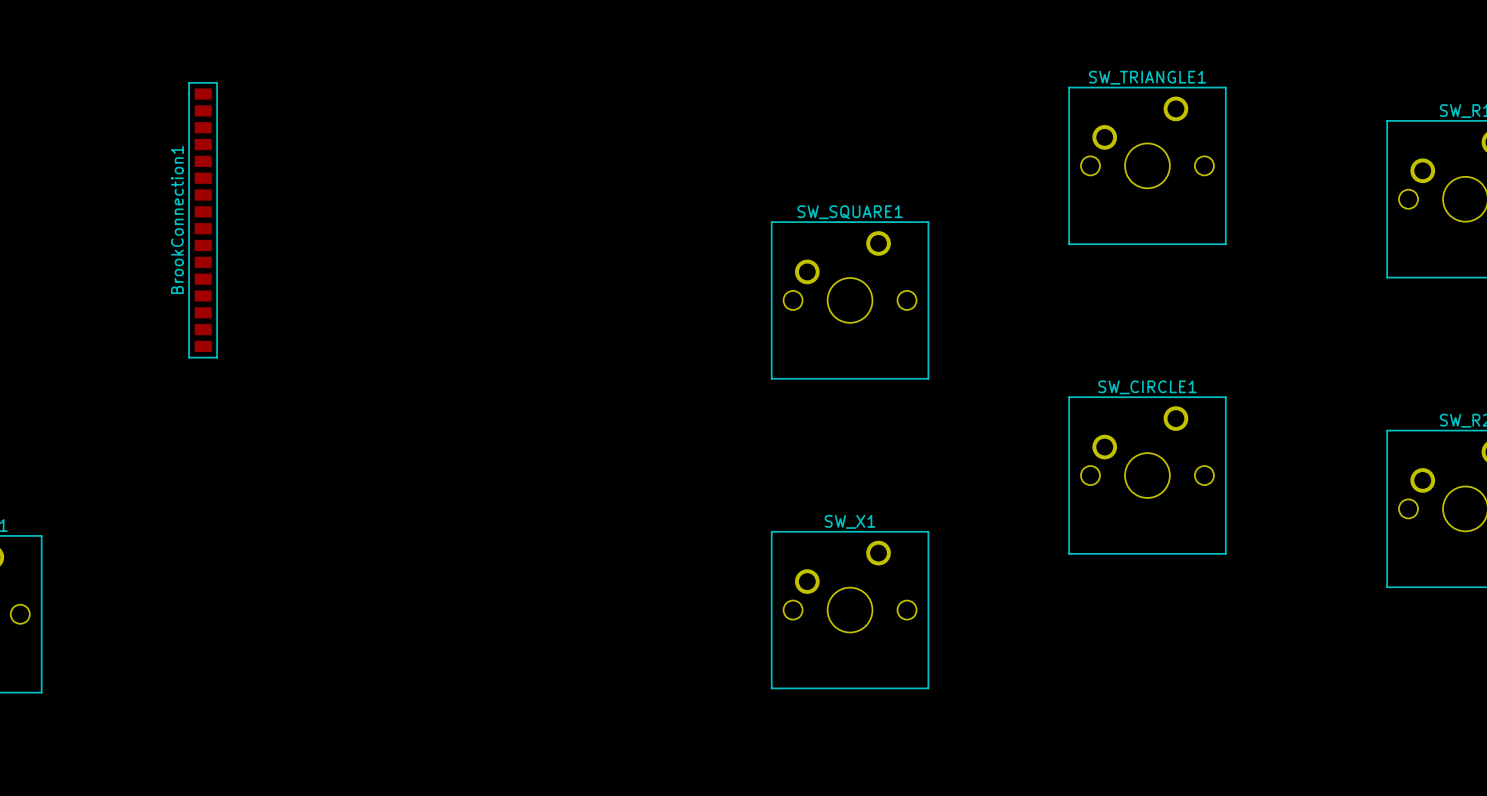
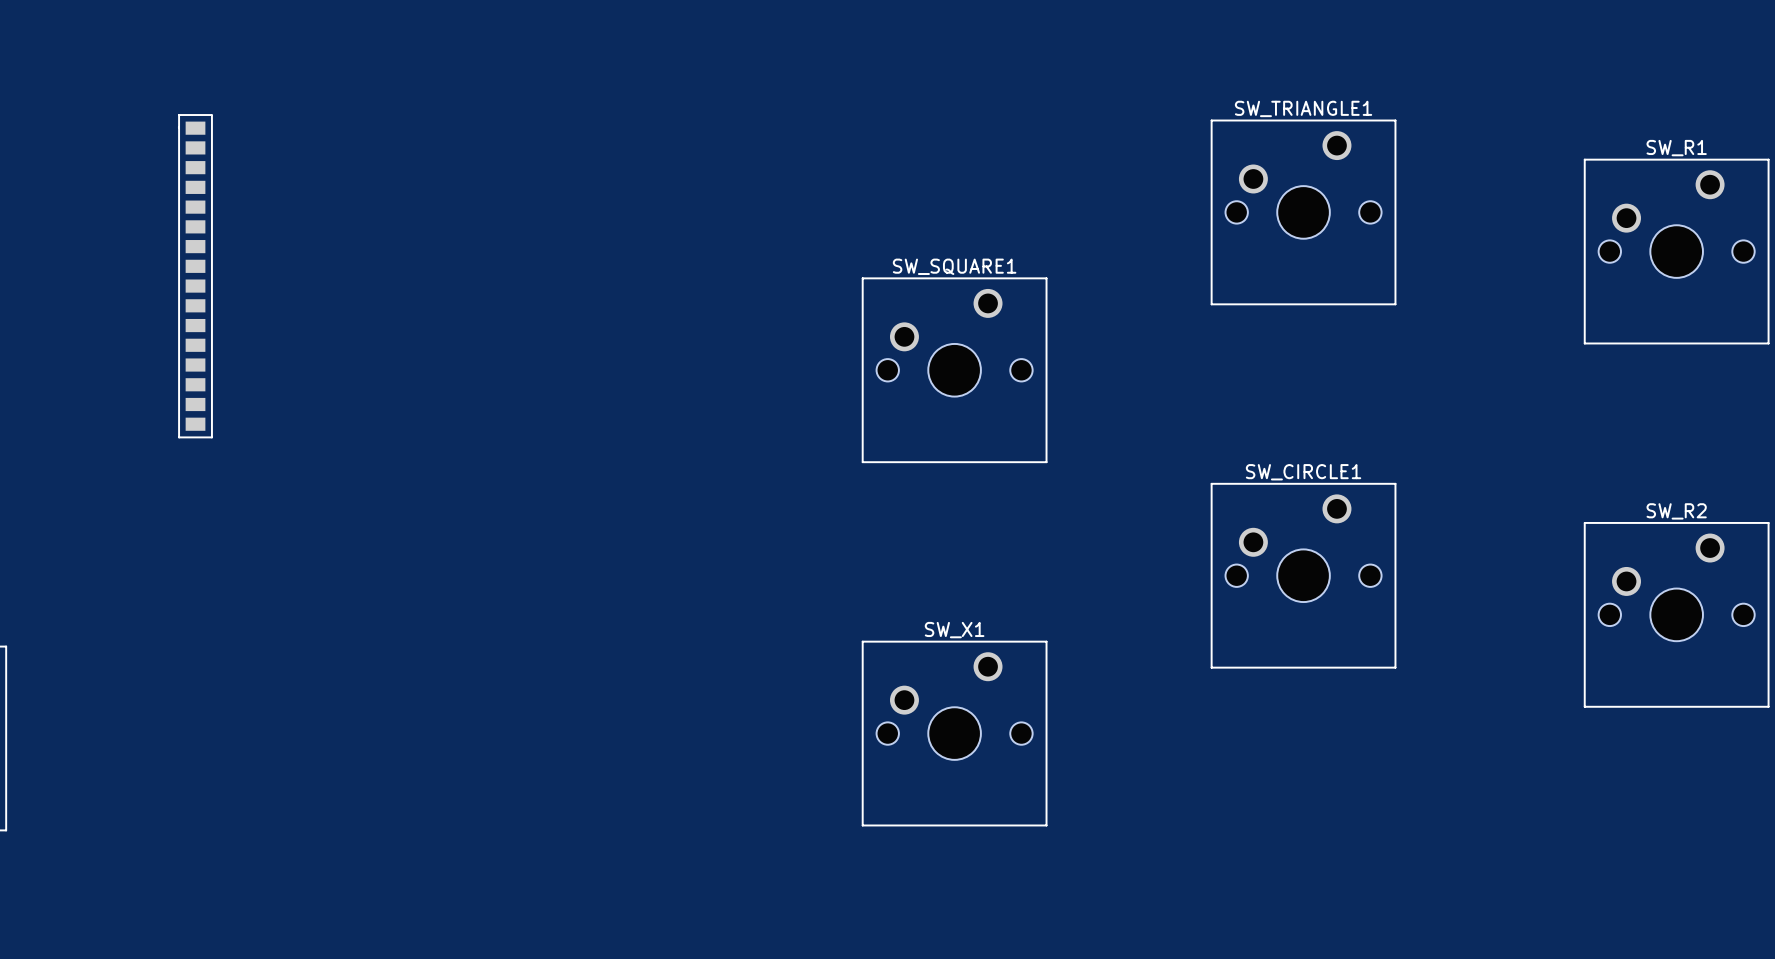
BrookConnection1 name: BrookConnection1 (177, 219) -> none

